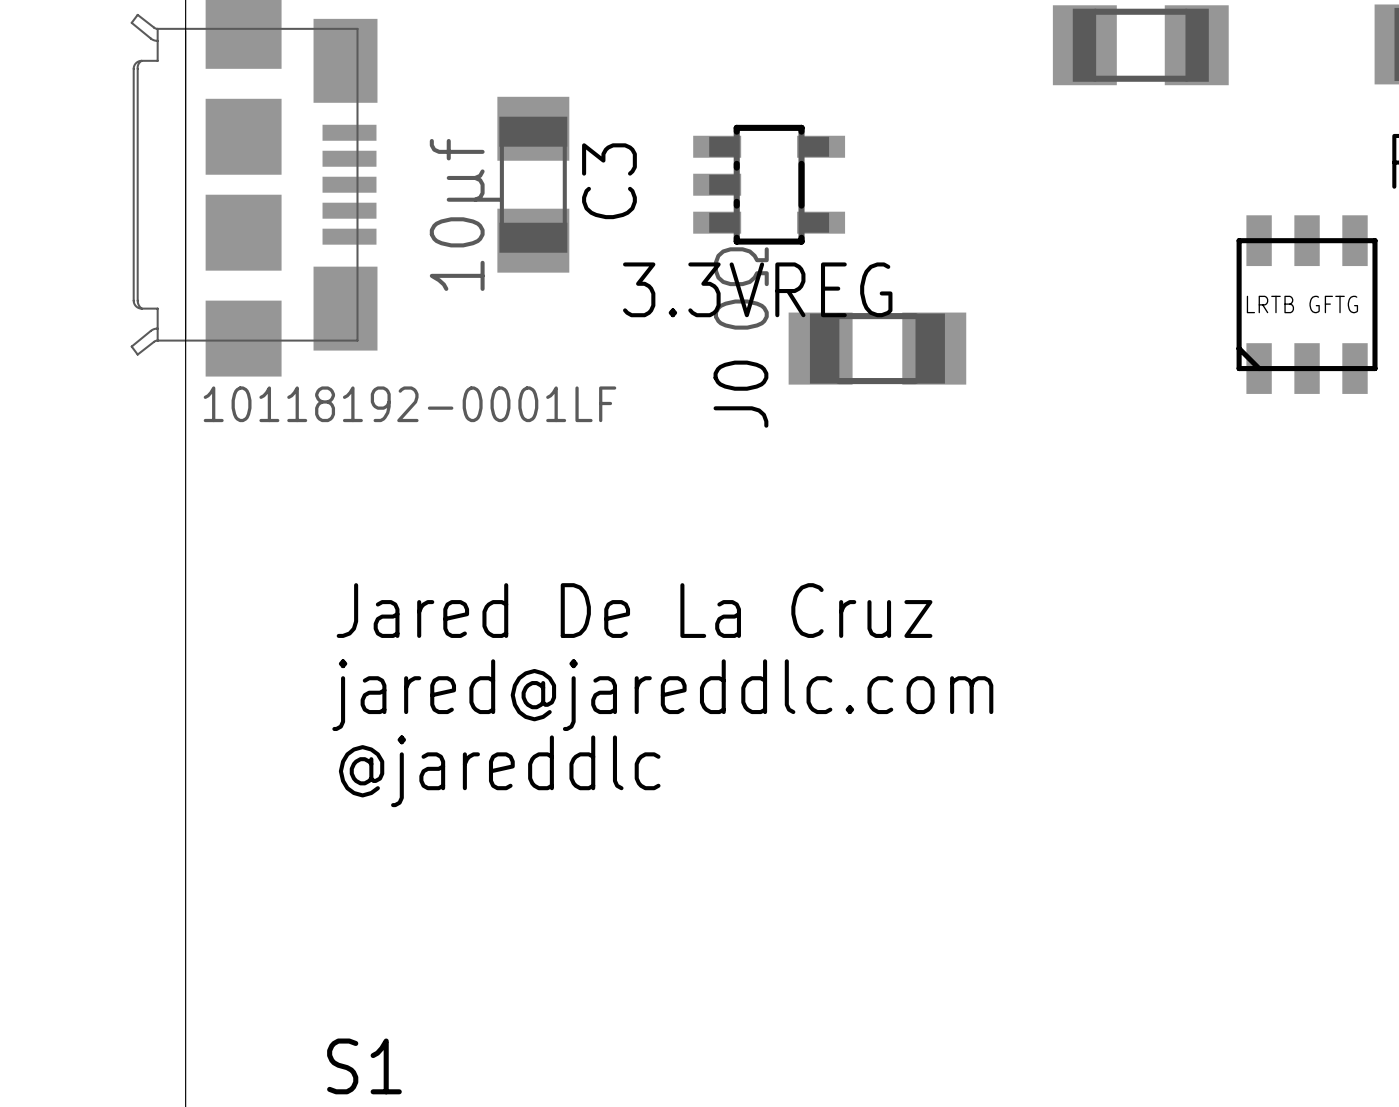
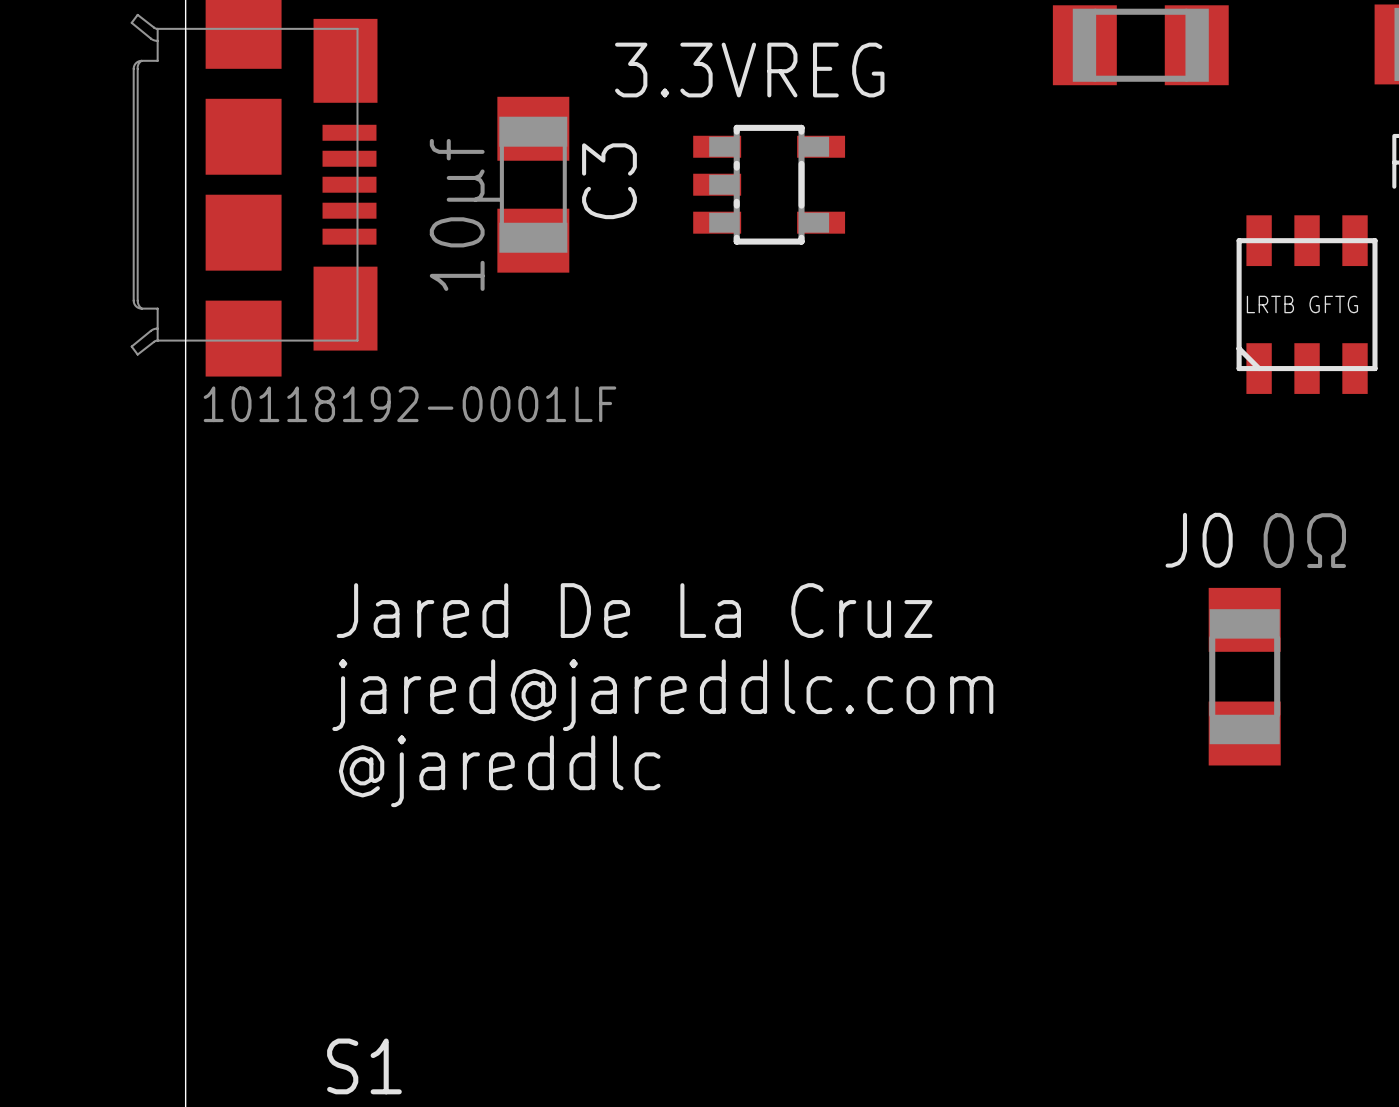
3.3VREG name position: 3.3VREG (757, 289) -> 3.3VREG (749, 70)
J0 rotation: 0° (877, 348) -> 90° clockwise (1244, 676)
J0 position: (877, 348) -> (1244, 676)

